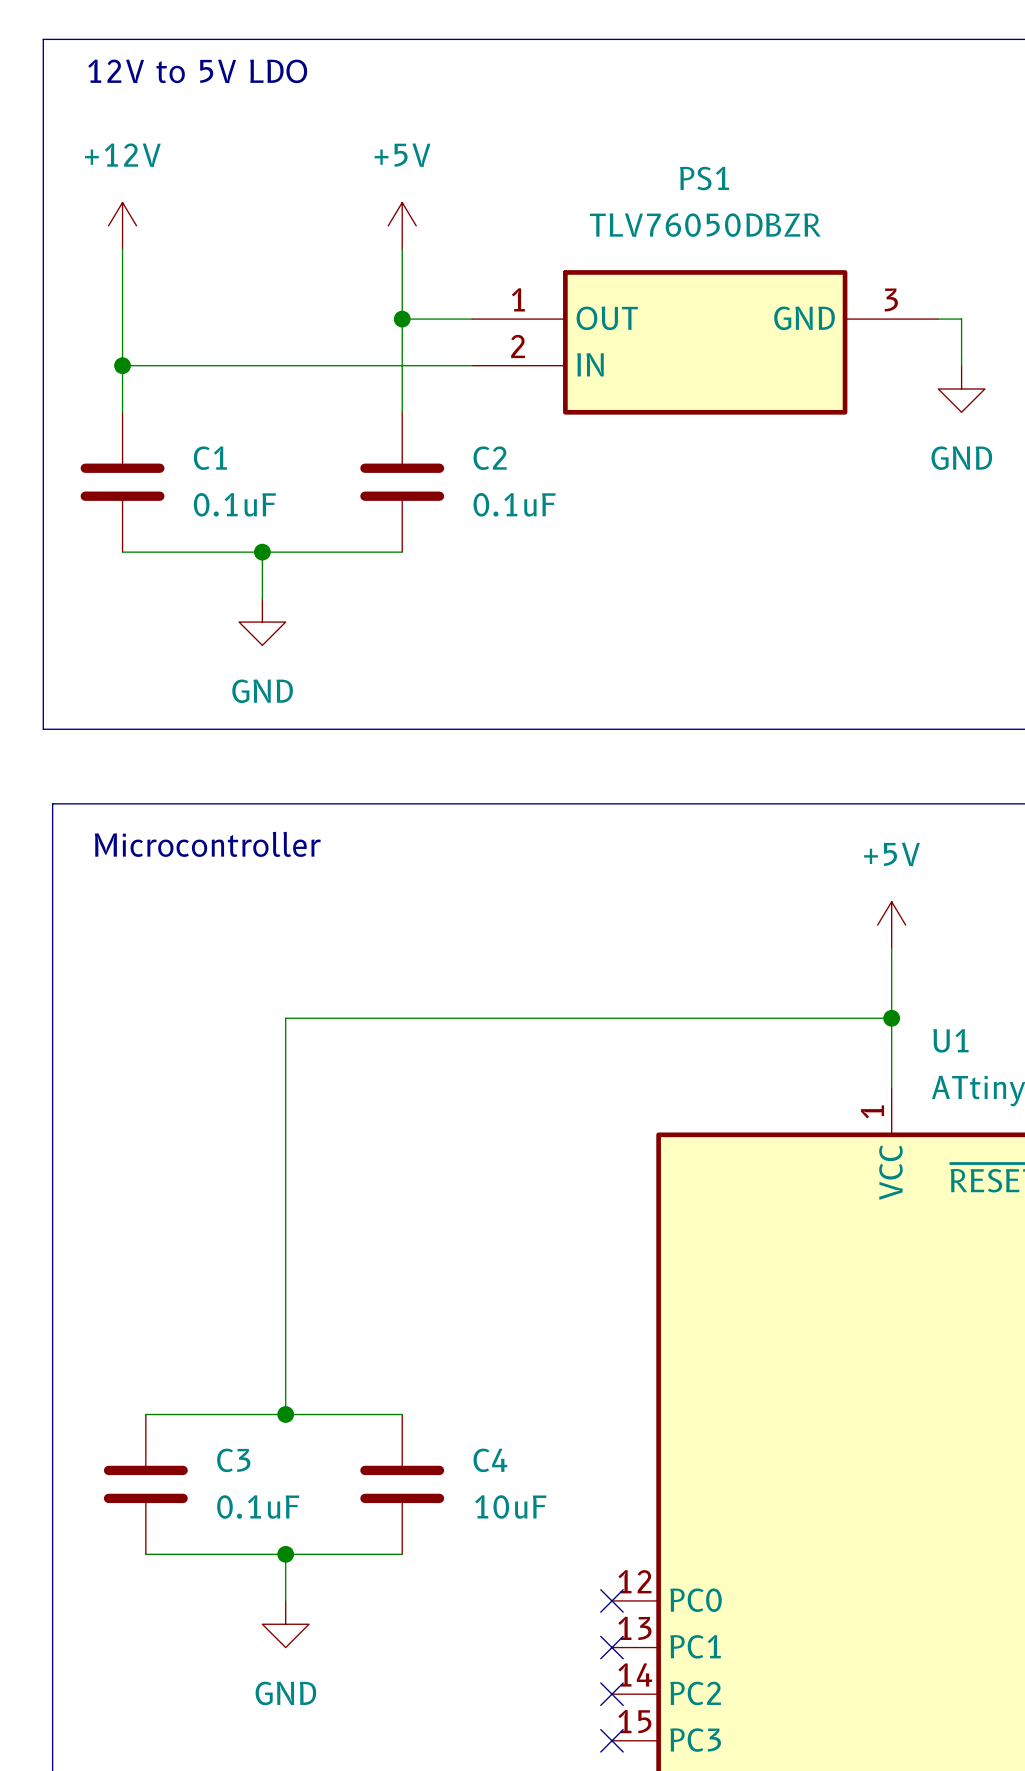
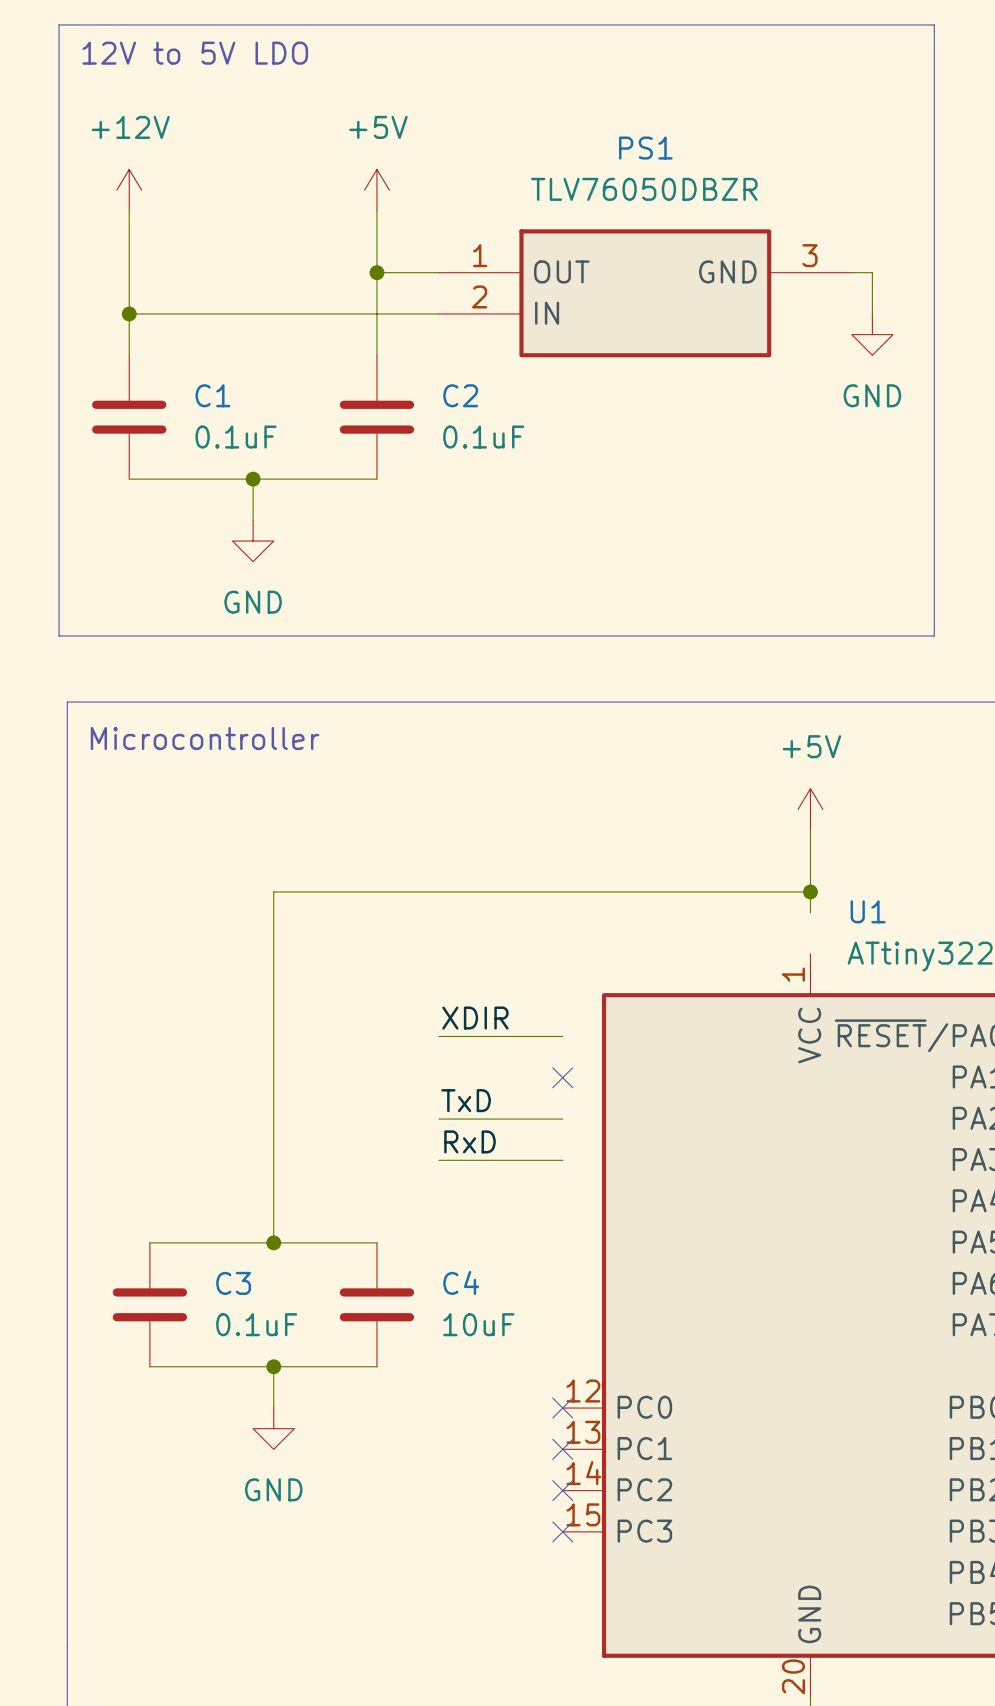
wire: (891, 1041) (891, 1088) -> none
label: none -> XDIR (475, 1018)
wire: none -> (438, 1036) (562, 1036)
no-connect mark: none -> (562, 1077)
label: none -> TxD (466, 1100)
wire: none -> (438, 1119) (562, 1119)
label: none -> RxD (470, 1141)
wire: none -> (438, 1160) (562, 1160)

